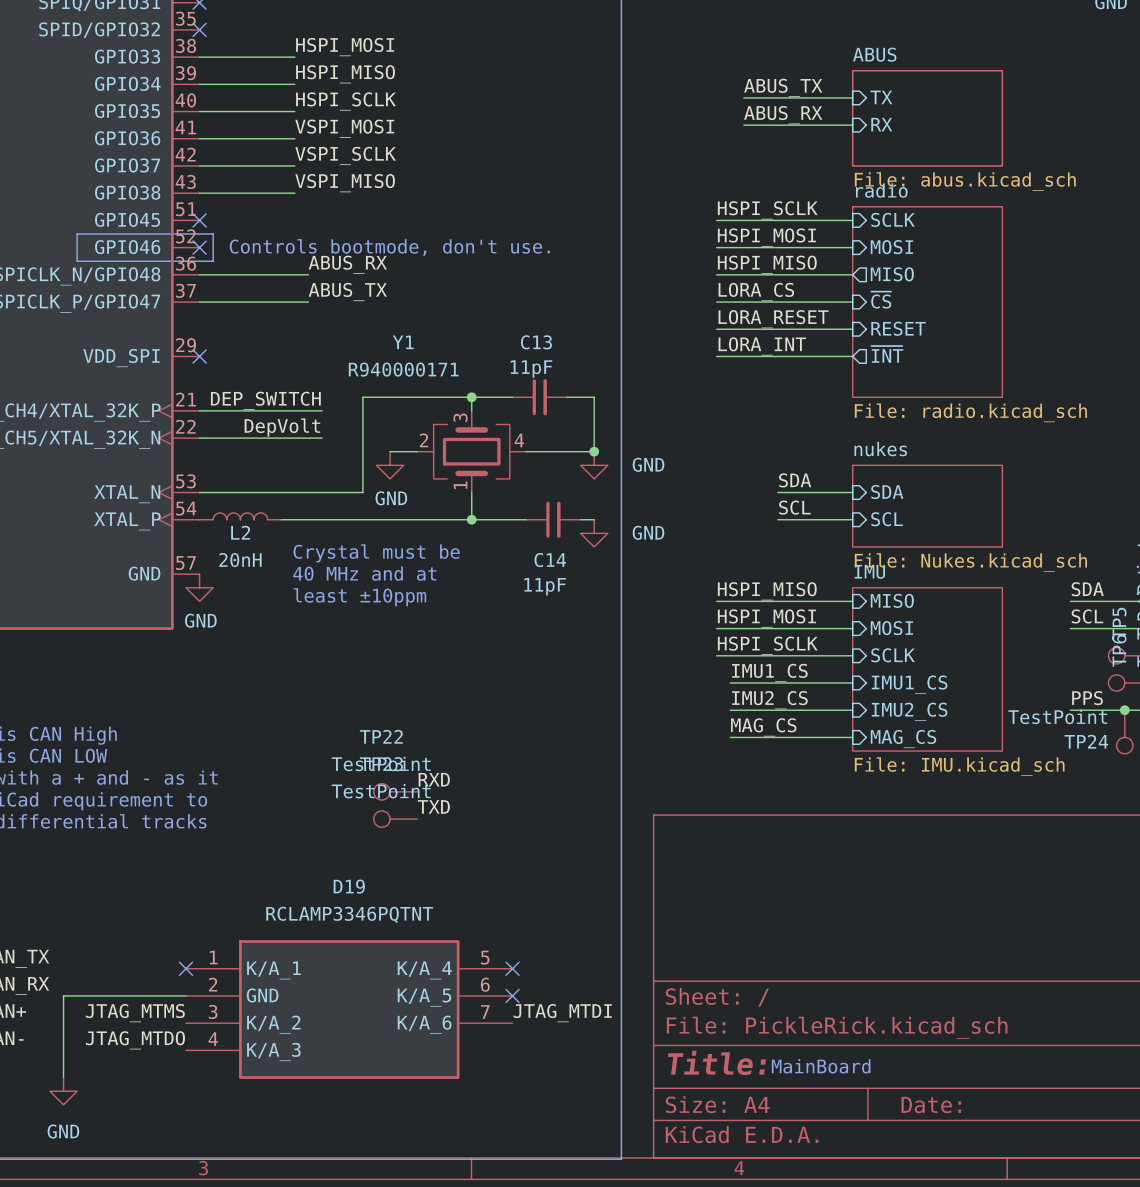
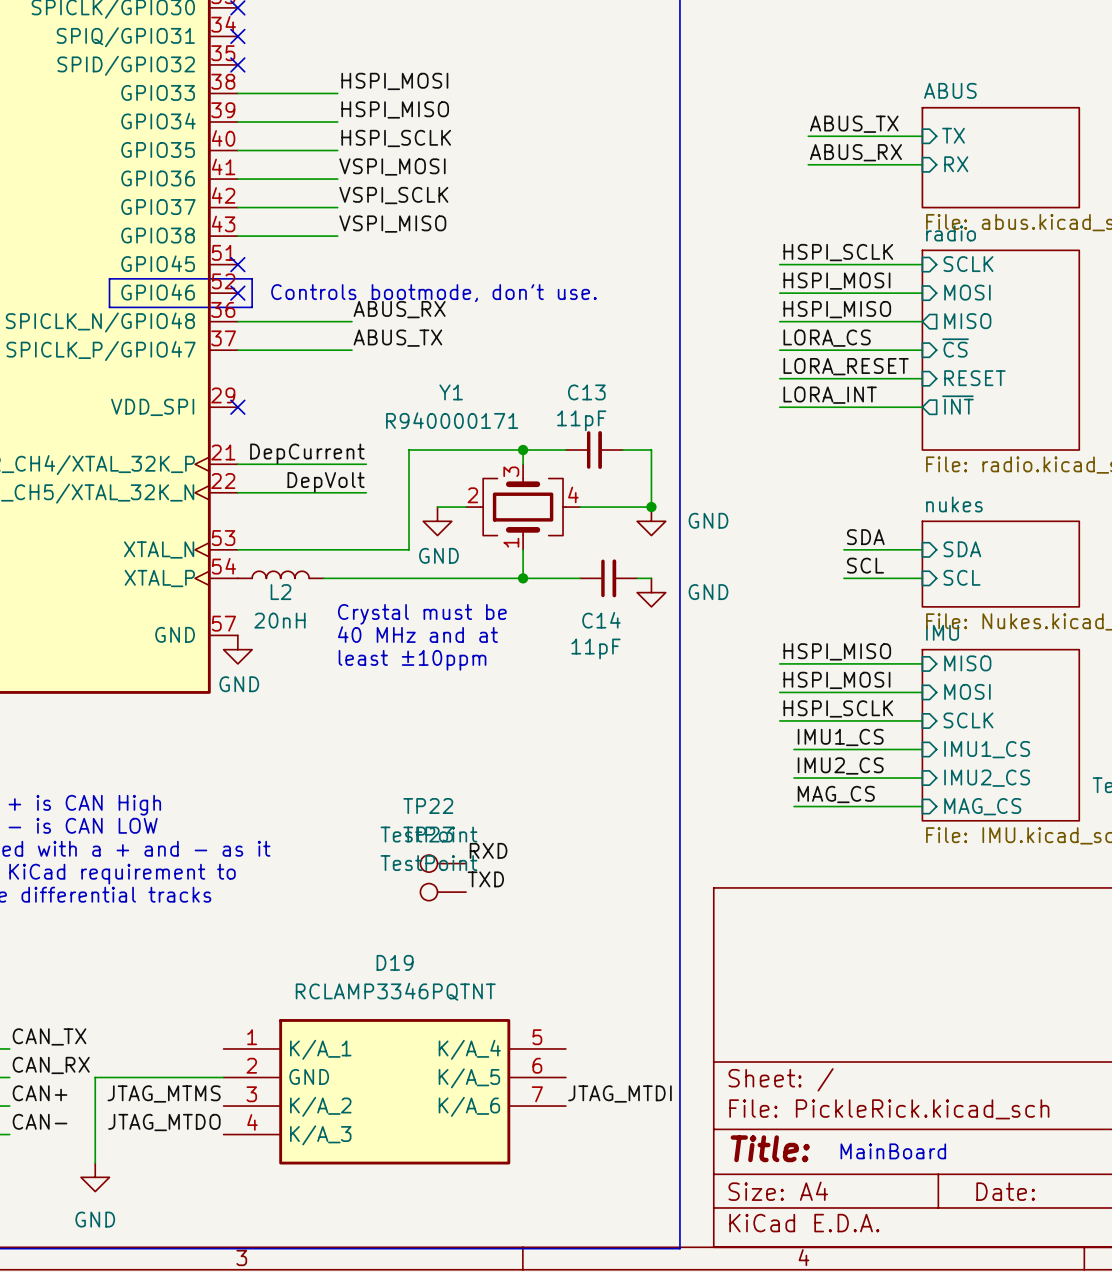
label: DEP_SWITCH (265, 400) -> DepCurrent (307, 453)
no-connect mark: (186, 968) -> none
no-connect mark: (512, 968) -> none
no-connect mark: (512, 995) -> none

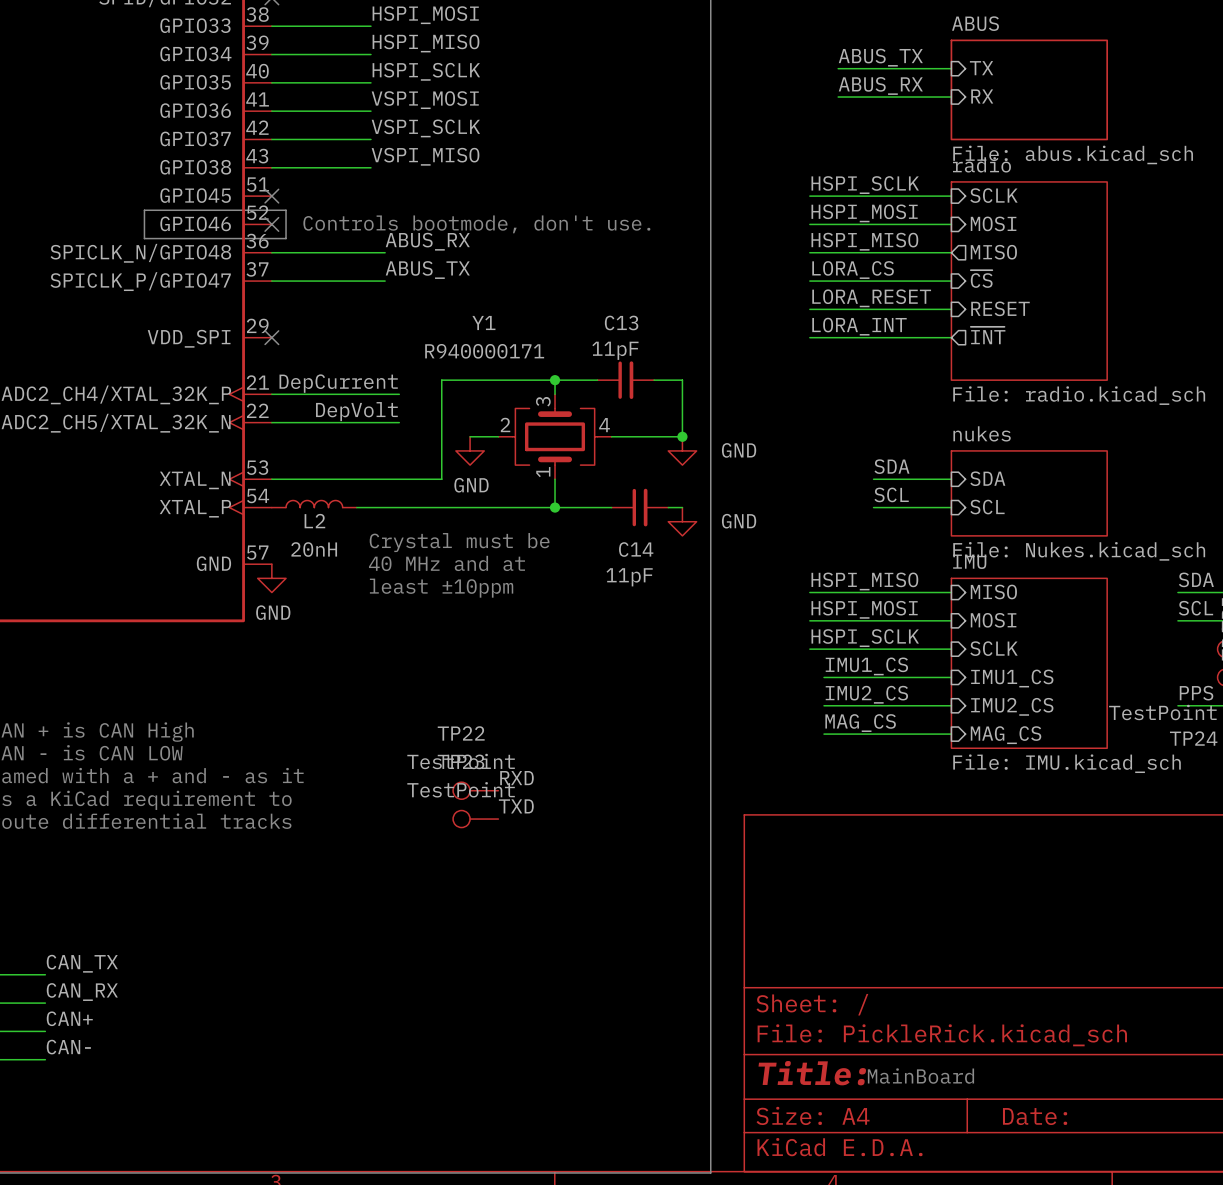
wire: (223, 1077) (95, 1077) (95, 1163) -> none
D19: RCLAMP3346PQTNT (394, 1091) -> none
label: JTAG_MTMS (164, 1093) -> none
label: JTAG_MTDI (619, 1093) -> none
label: JTAG_MTDO (164, 1122) -> none
power symbol: GND (95, 1177) -> none

